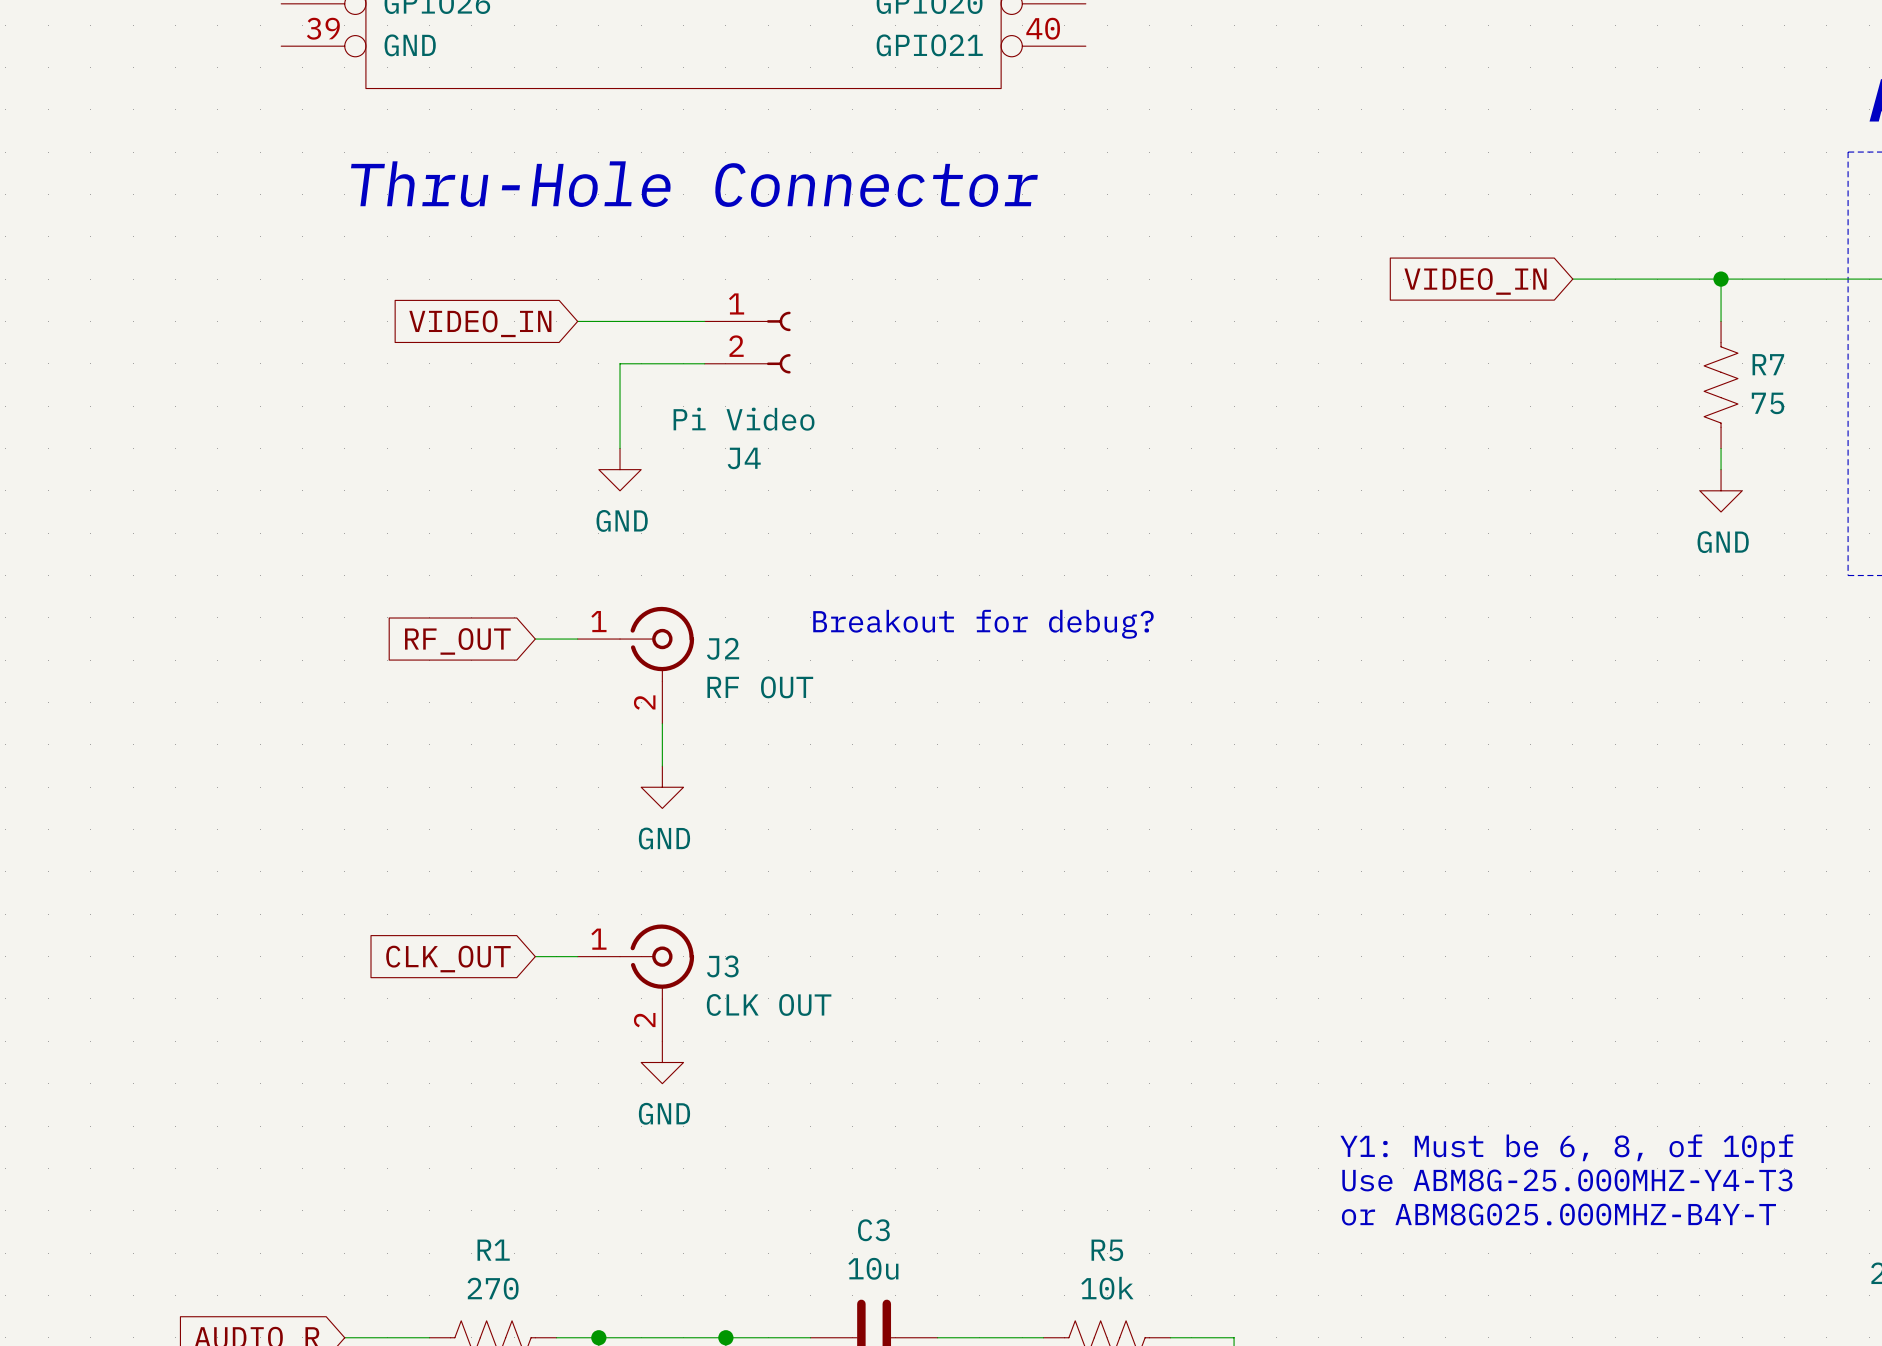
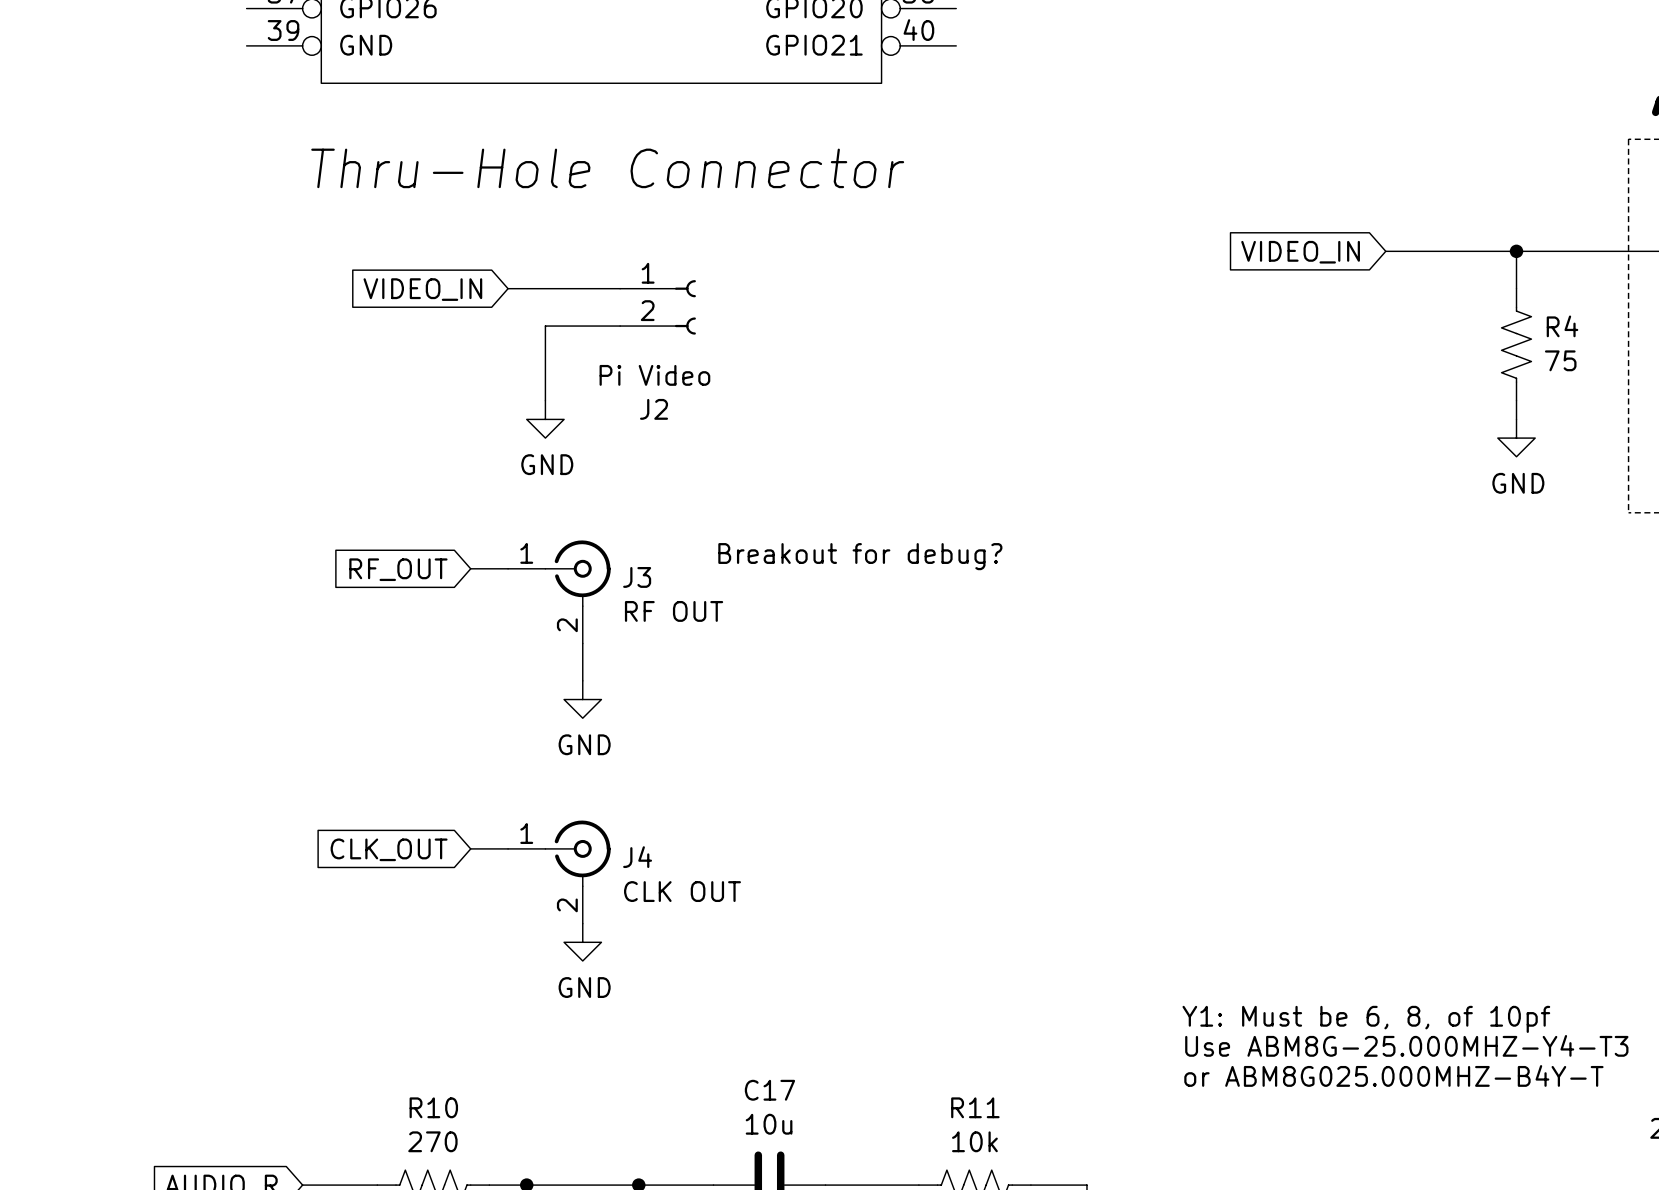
R7 name: R7 (1768, 364) -> R4 (1562, 326)
J4 name: J4 (744, 458) -> J2 (654, 409)
J2 name: J2 (723, 648) -> J3 (637, 577)
J3 name: J3 (722, 966) -> J4 (637, 857)
C3 name: C3 (873, 1230) -> C17 (769, 1090)
R1 name: R1 (493, 1250) -> R10 (433, 1107)
R5 name: R5 (1107, 1250) -> R11 (975, 1107)

